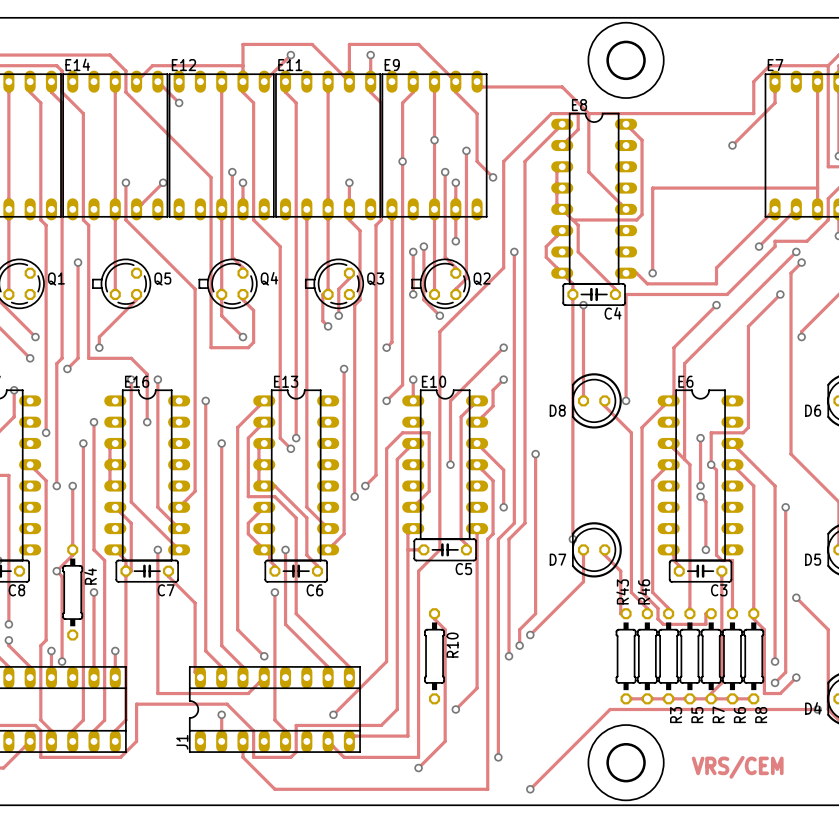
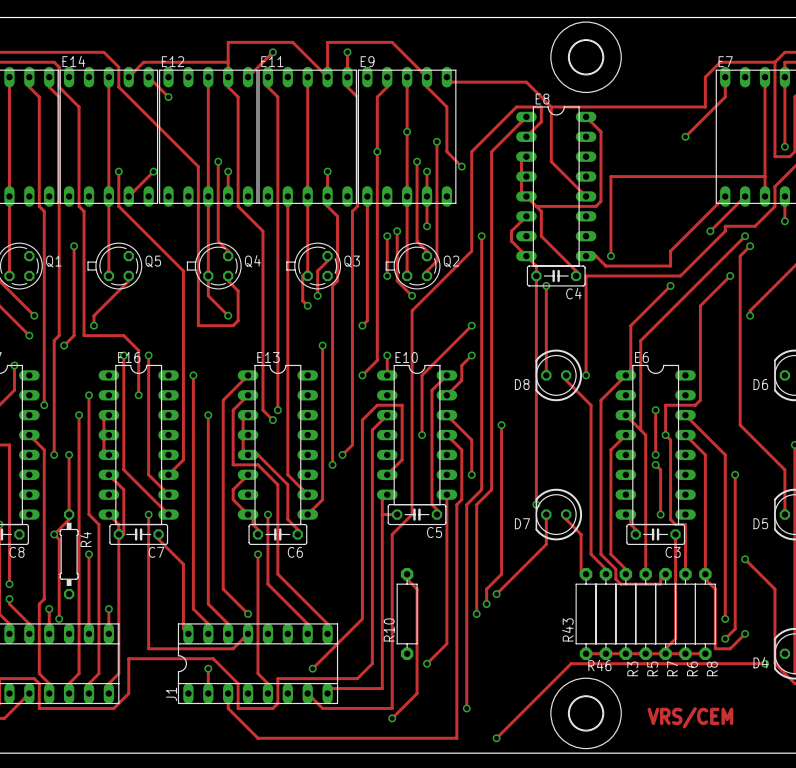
R43 name position: R43 (622, 591) -> R43 (567, 629)
R46 name rotation: 0° (643, 591) -> 90° clockwise (599, 665)
R46 name position: R46 (643, 591) -> R46 (599, 665)
R10 footprint: [424, 608, 445, 705] -> [396, 567, 418, 661]
R43 footprint: [615, 608, 637, 705] -> [575, 567, 597, 661]
R46 footprint: [637, 608, 658, 705] -> [595, 567, 617, 661]
R3 footprint: [658, 608, 679, 705] -> [615, 567, 637, 661]
R5 footprint: [679, 608, 701, 705] -> [635, 567, 657, 661]
R7 footprint: [700, 608, 722, 705] -> [655, 567, 677, 661]
R6 footprint: [722, 608, 743, 705] -> [675, 567, 696, 661]
R8 footprint: [743, 608, 764, 705] -> [694, 567, 716, 661]
R10 name position: R10 (452, 645) -> R10 (389, 629)

